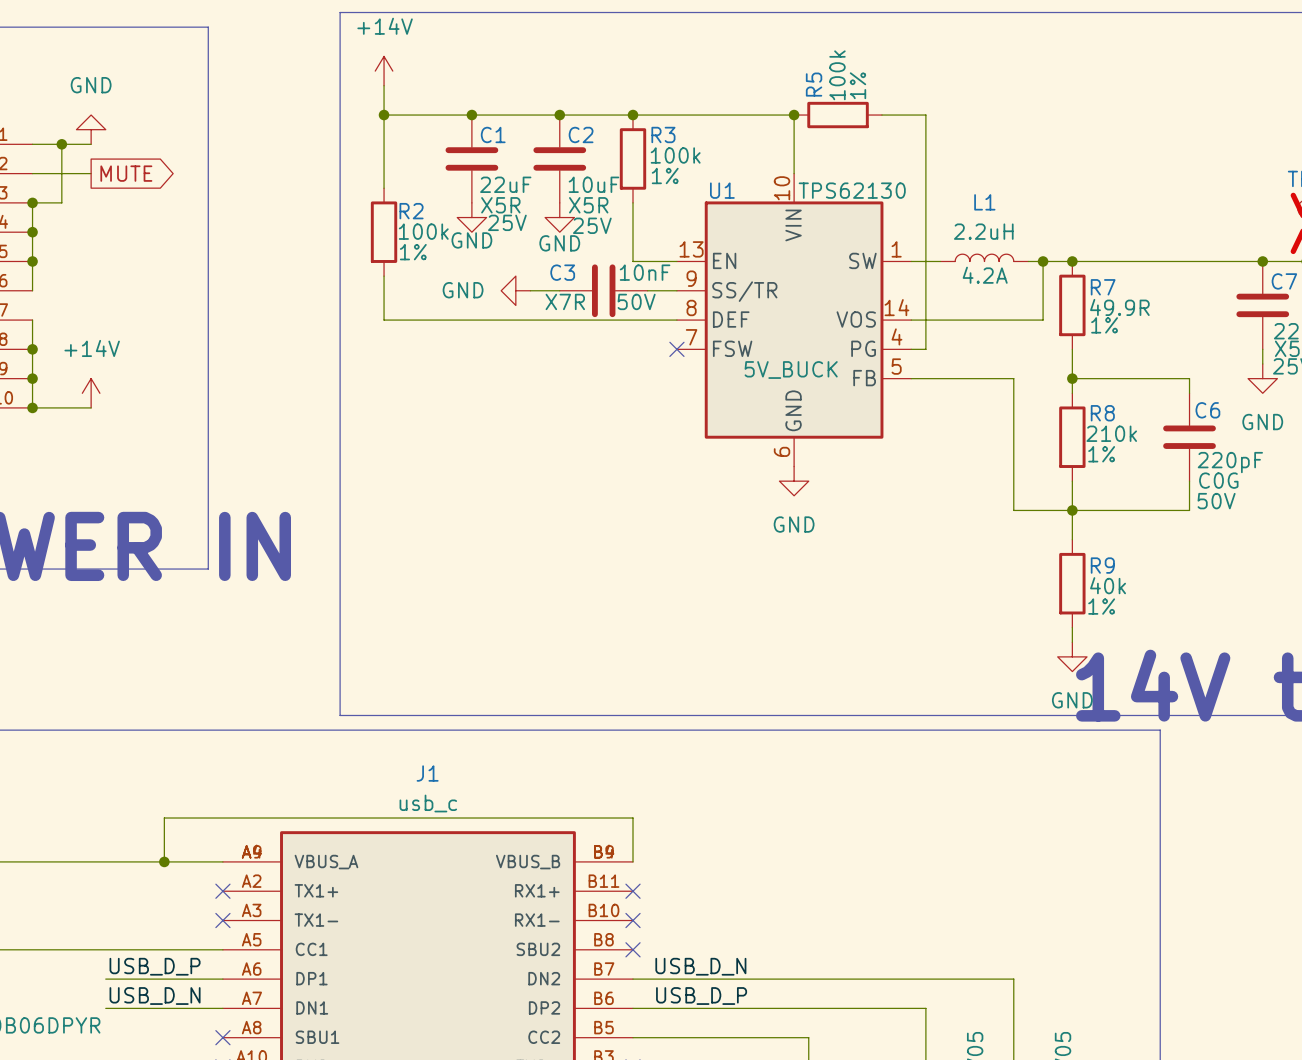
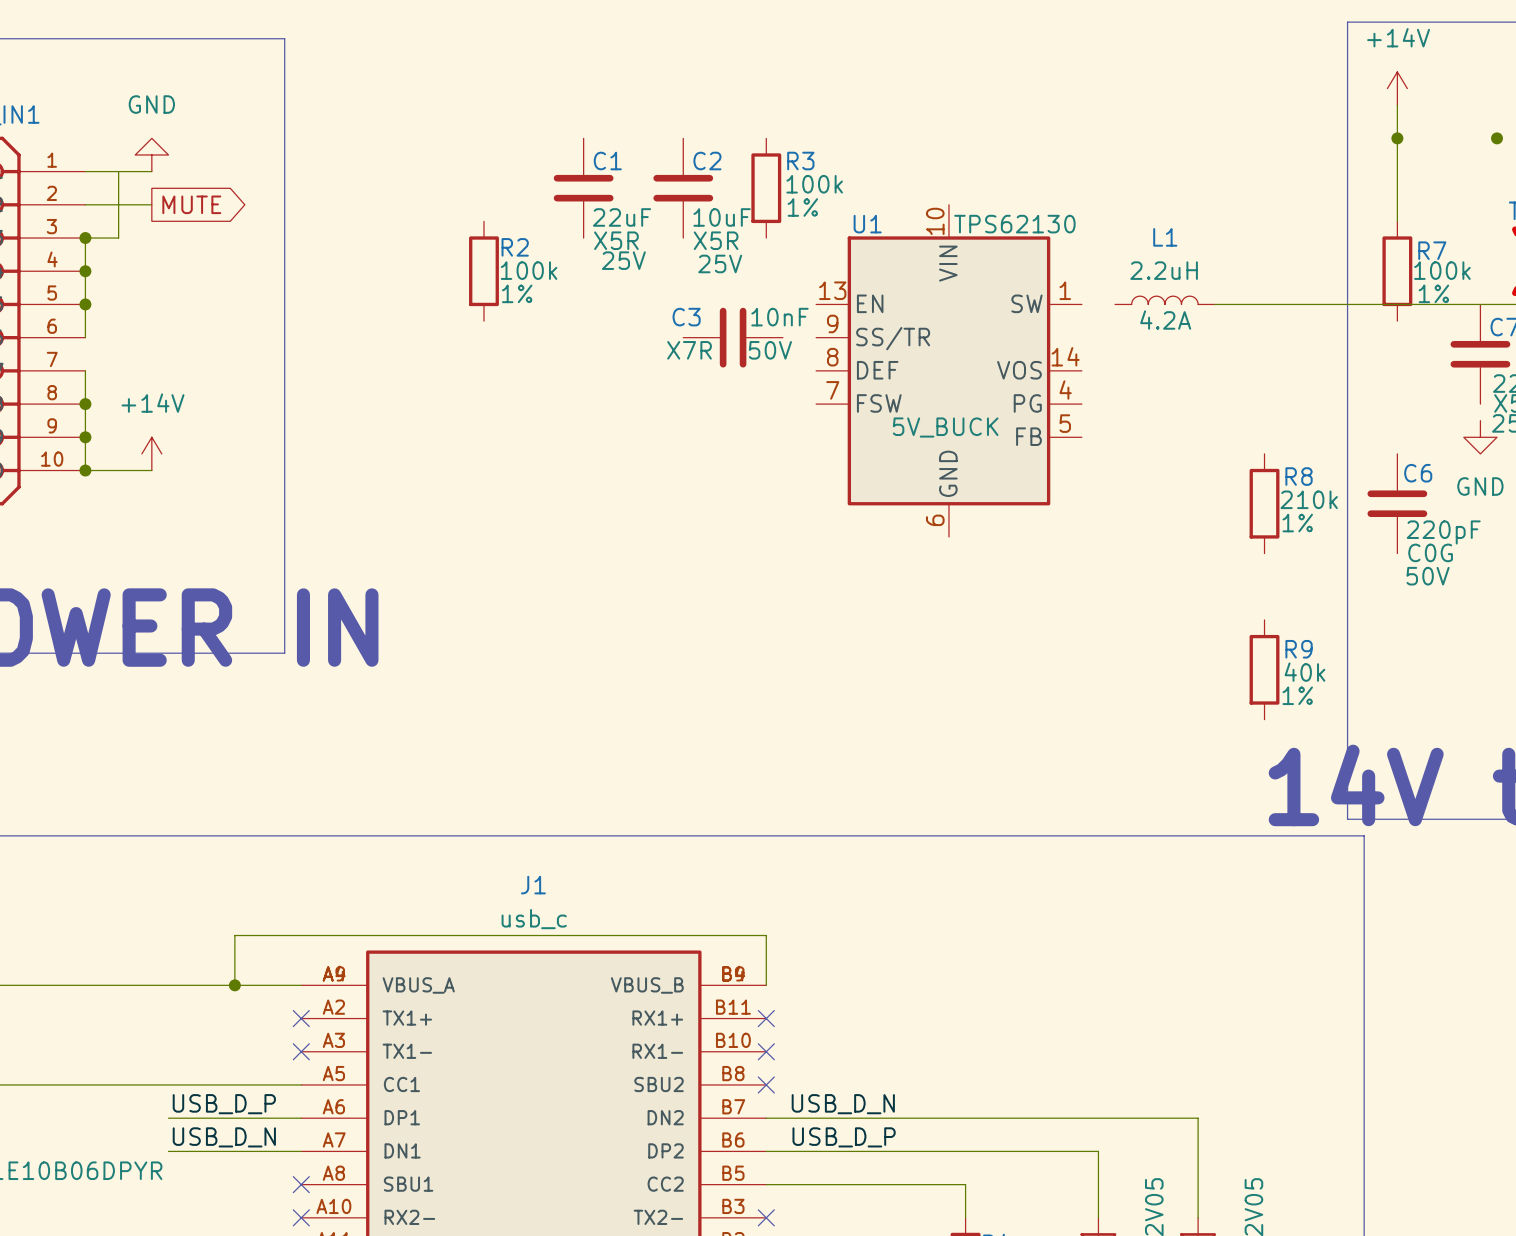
line: (1145, 12) (340, 12) (340, 715) (1145, 715) -> (1347, 22) (1347, 819)
power symbol: +14V (384, 71) -> none
power symbol: none -> +14V (1397, 88)
wire: (384, 85) (384, 188) -> none
wire: none -> (1397, 105) (1397, 221)
wire: (384, 115) (794, 115) (794, 173) -> none
junction: (384, 115) -> none
junction: (471, 115) -> none
junction: (559, 115) -> none
junction: (633, 115) -> none
junction: (794, 115) -> none
R5: 100k (838, 115) -> none
wire: (881, 115) (925, 115) (925, 349) (911, 349) -> none
junction: none -> (1397, 138)
junction: none -> (1497, 138)
junction: (61, 144) -> none
wire: (633, 202) (633, 261) (676, 261) -> none
power symbol: GND (471, 217) -> none
power symbol: GND (559, 217) -> none
wire: (911, 261) (940, 261) -> none
wire: (1043, 261) (1043, 320) (911, 320) -> none
junction: (1043, 261) -> none
junction: (1072, 261) -> none
junction: (1262, 261) -> none
wire: (384, 276) (384, 320) (676, 320) -> none
power symbol: GND (515, 290) -> none
wire: (530, 290) (559, 290) -> none
wire: (647, 290) (676, 290) -> none
R7 position: (1072, 305) -> (1397, 271)
R7 value: 49.9R (1119, 307) -> 100k (1442, 270)
no-connect mark: (676, 349) -> none
wire: (1072, 349) (1072, 393) -> none
wire: (1262, 349) (1262, 364) -> none
wire: (911, 378) (1013, 378) (1013, 510) (1189, 510) (1189, 481) -> none
wire: (1072, 378) (1189, 378) (1189, 393) -> none
junction: (1072, 378) -> none
power symbol: GND (794, 481) -> none
wire: (1072, 481) (1072, 539) -> none
junction: (1072, 510) -> none
wire: (1072, 627) (1072, 642) -> none
power symbol: GND (1072, 656) -> none

